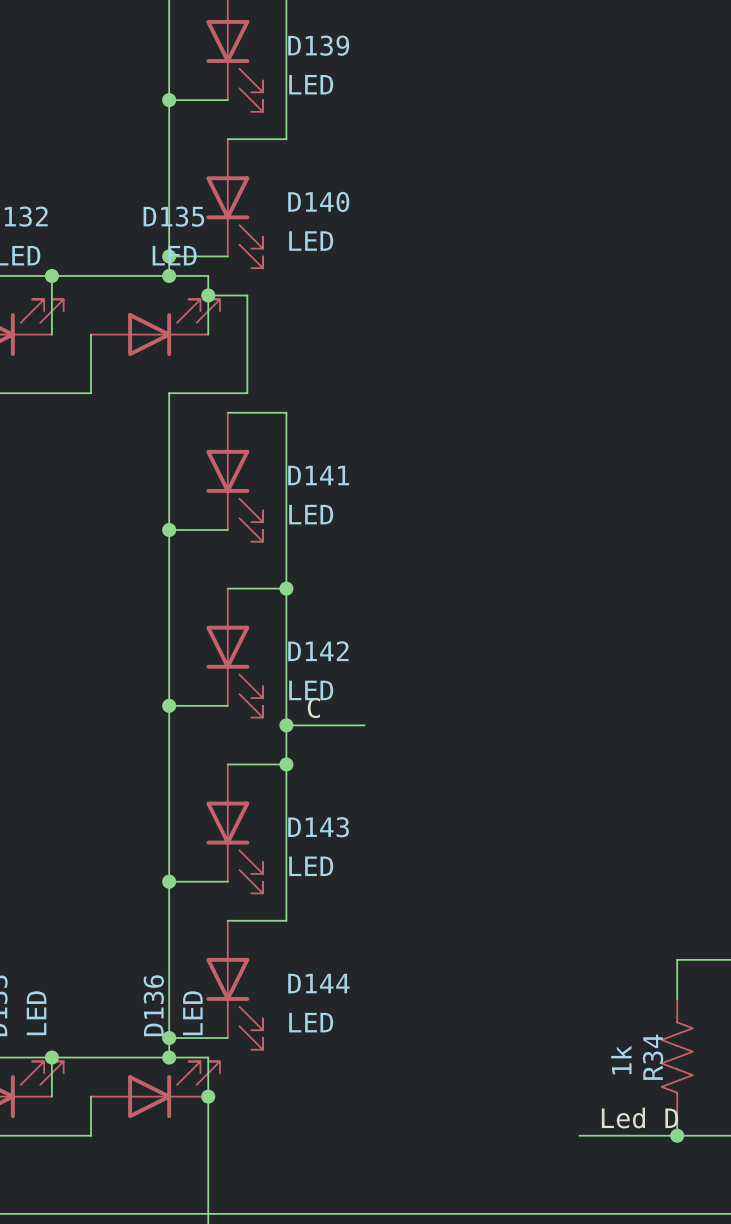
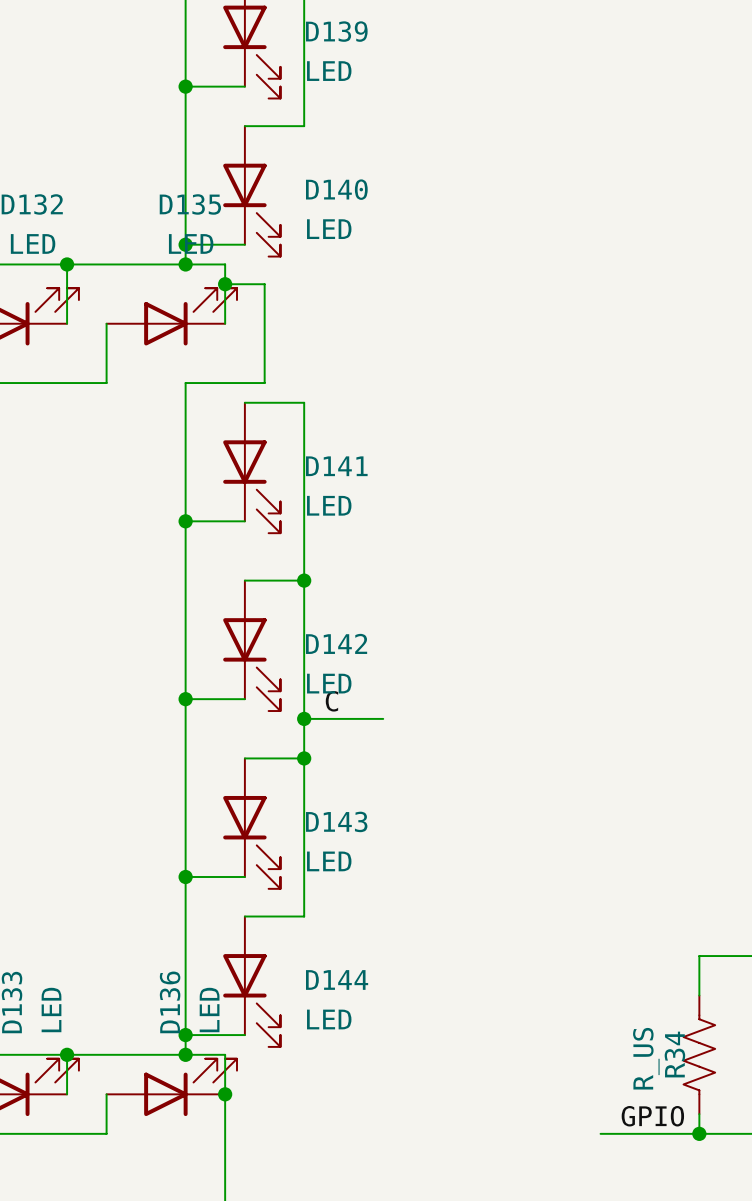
R34 value: 1k (621, 1060) -> R_US (646, 1058)
label: Led D (639, 1118) -> GPIO (652, 1116)

